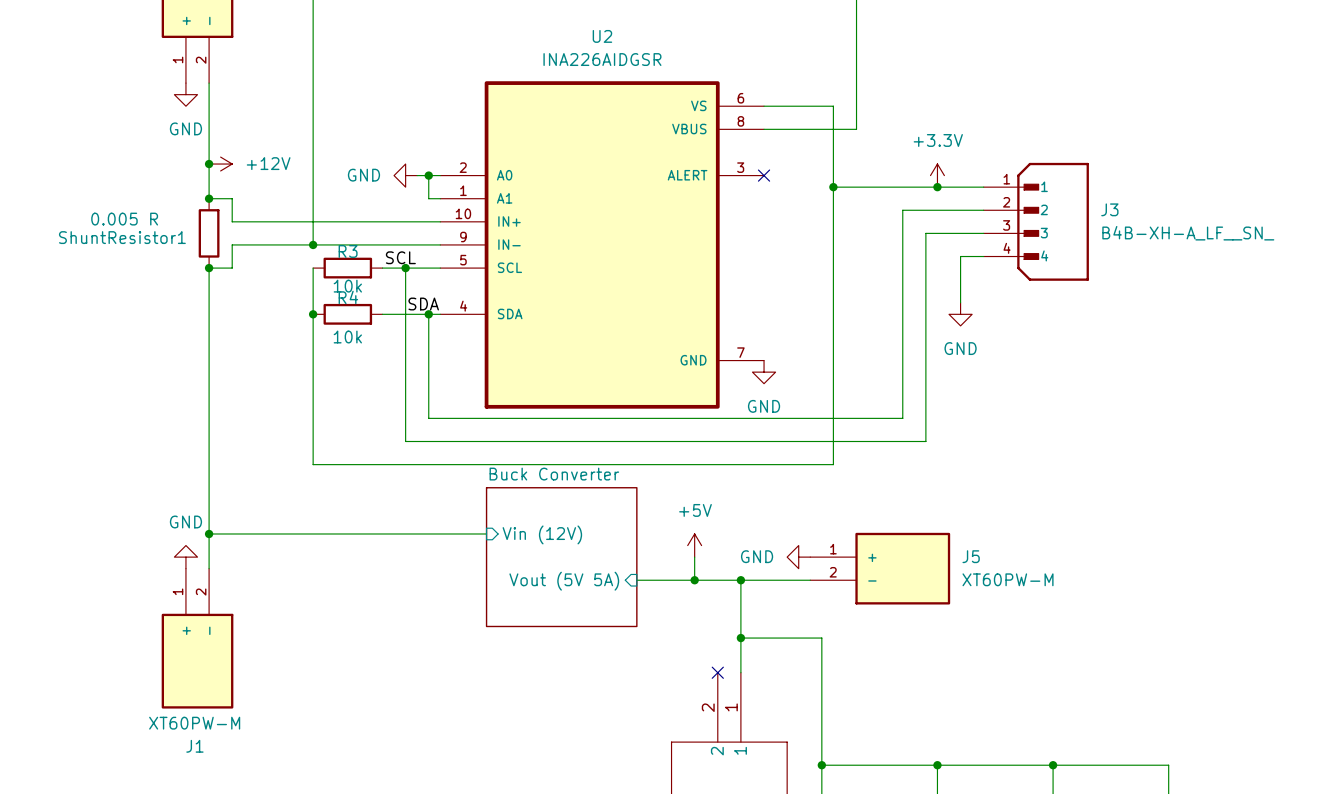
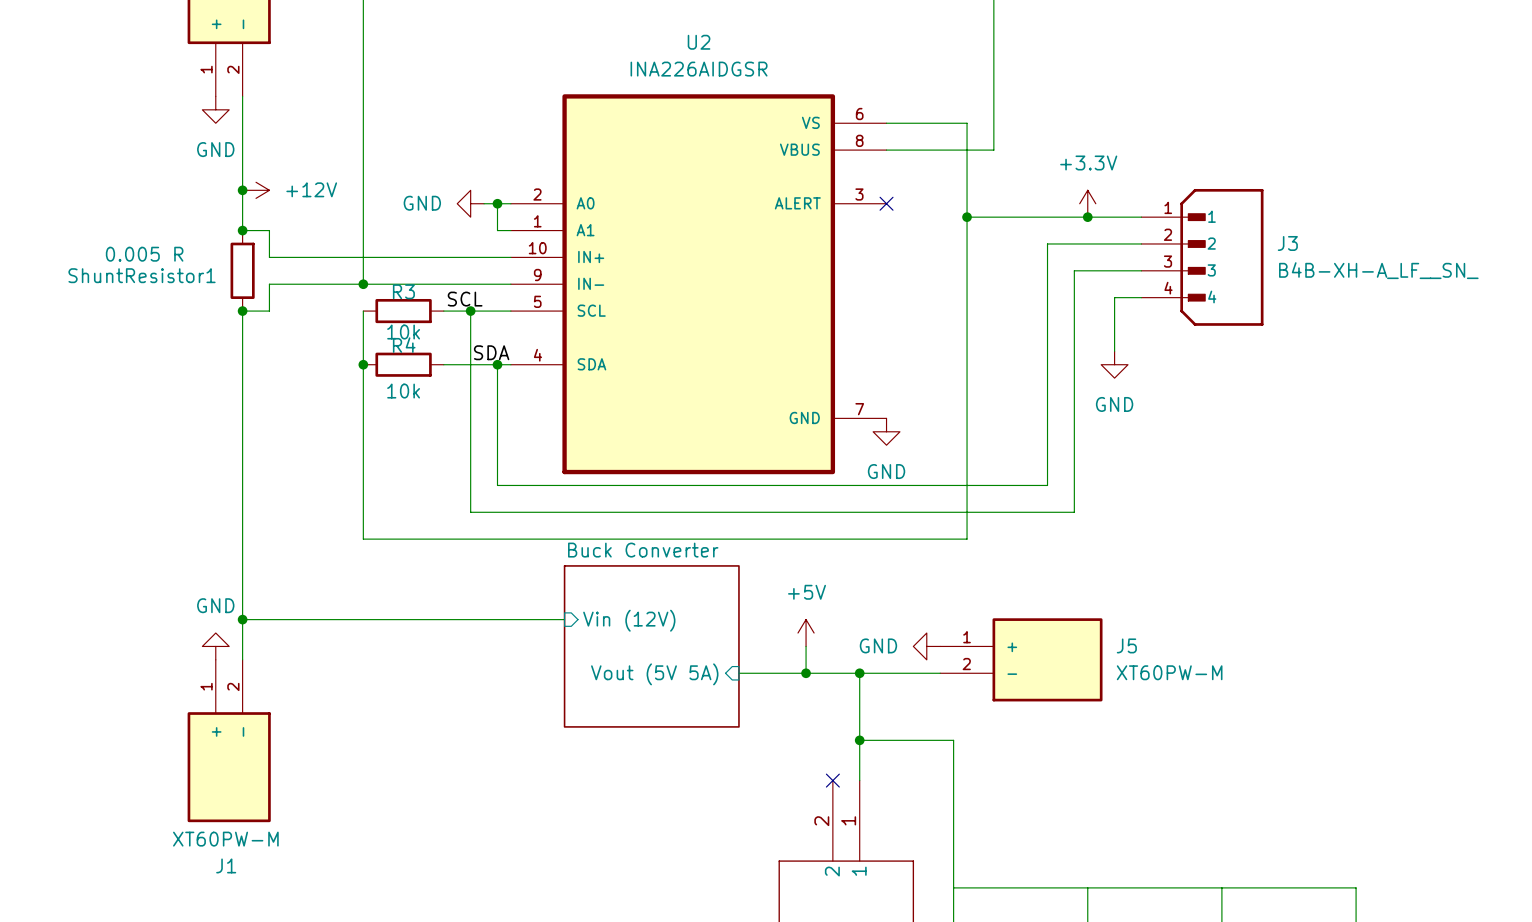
junction: (821, 765) -> none
junction: (937, 765) -> none
junction: (1053, 765) -> none

